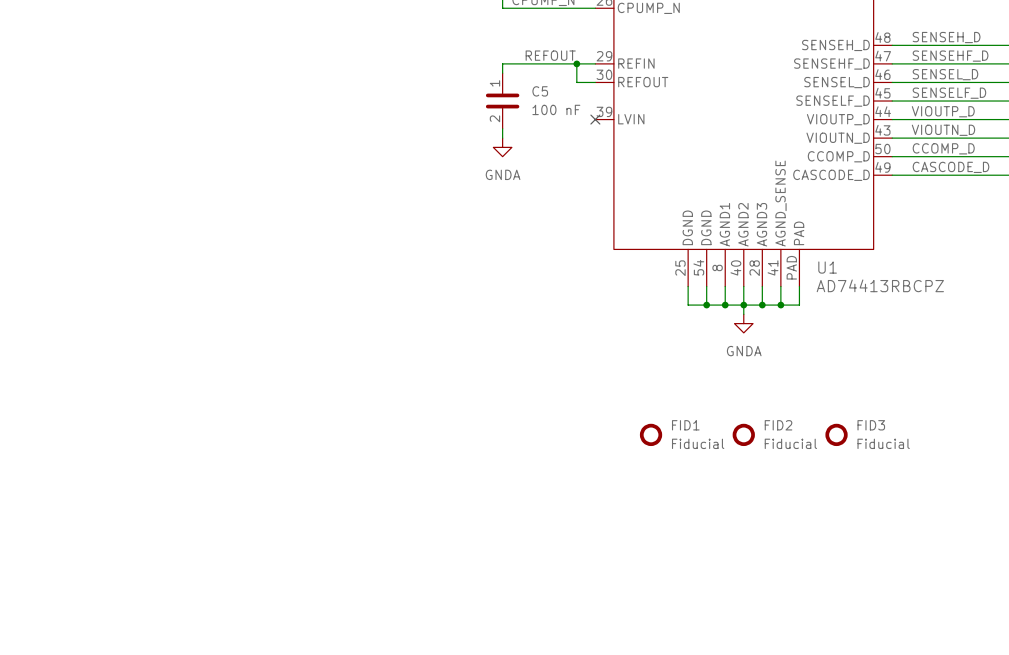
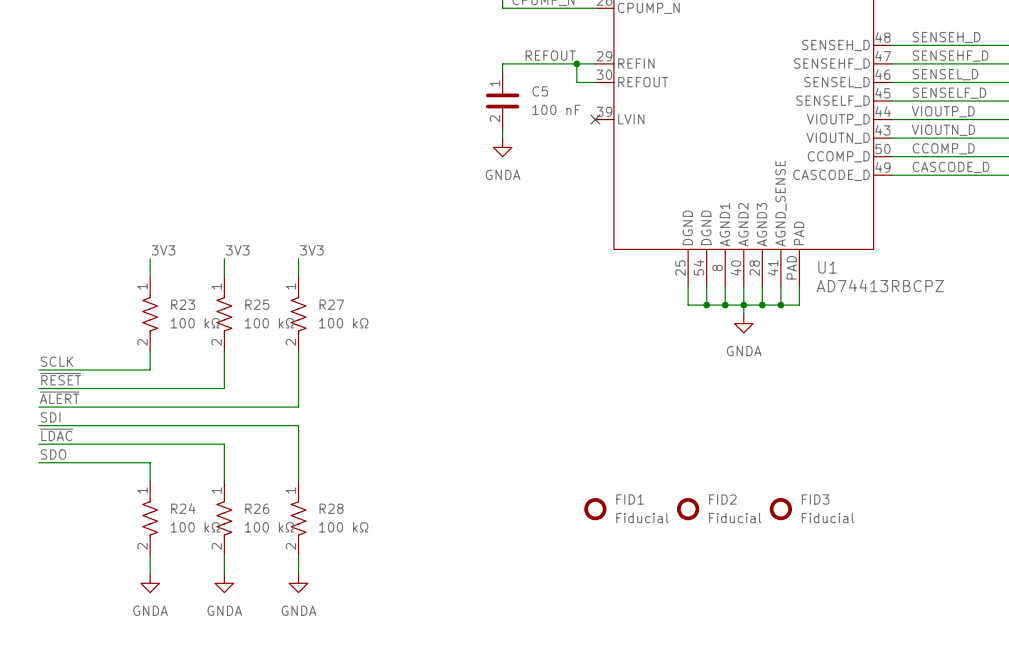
label: none -> 3V3 (163, 250)
label: none -> 3V3 (237, 250)
label: none -> 3V3 (311, 250)
wire: none -> (150, 258) (150, 277)
wire: none -> (224, 258) (224, 277)
wire: none -> (298, 258) (298, 277)
R23: none -> 100 kΩ (150, 314)
R25: none -> 100 kΩ (224, 314)
R27: none -> 100 kΩ (298, 314)
wire: none -> (150, 351) (150, 369) (38, 369)
wire: none -> (224, 351) (224, 388) (38, 388)
wire: none -> (298, 351) (298, 407) (38, 407)
label: none -> SCLK (57, 361)
label: none -> ~{RESET} (60, 379)
label: none -> ~{ALERT} (59, 397)
label: none -> SDI (50, 417)
wire: none -> (38, 425) (298, 425) (298, 481)
label: none -> ~{LDAC} (56, 434)
FID1 position: (651, 434) -> (595, 509)
FID2 position: (743, 434) -> (688, 509)
FID3 position: (836, 434) -> (780, 509)
wire: none -> (38, 444) (224, 444) (224, 481)
label: none -> SDO (53, 454)
wire: none -> (38, 462) (150, 462) (150, 481)
R24: none -> 100 kΩ (150, 518)
R26: none -> 100 kΩ (224, 518)
R28: none -> 100 kΩ (298, 518)
wire: none -> (150, 555) (150, 574)
wire: none -> (224, 555) (224, 574)
wire: none -> (298, 555) (298, 574)
power symbol: none -> GNDA (150, 583)
power symbol: none -> GNDA (224, 583)
power symbol: none -> GNDA (298, 583)

